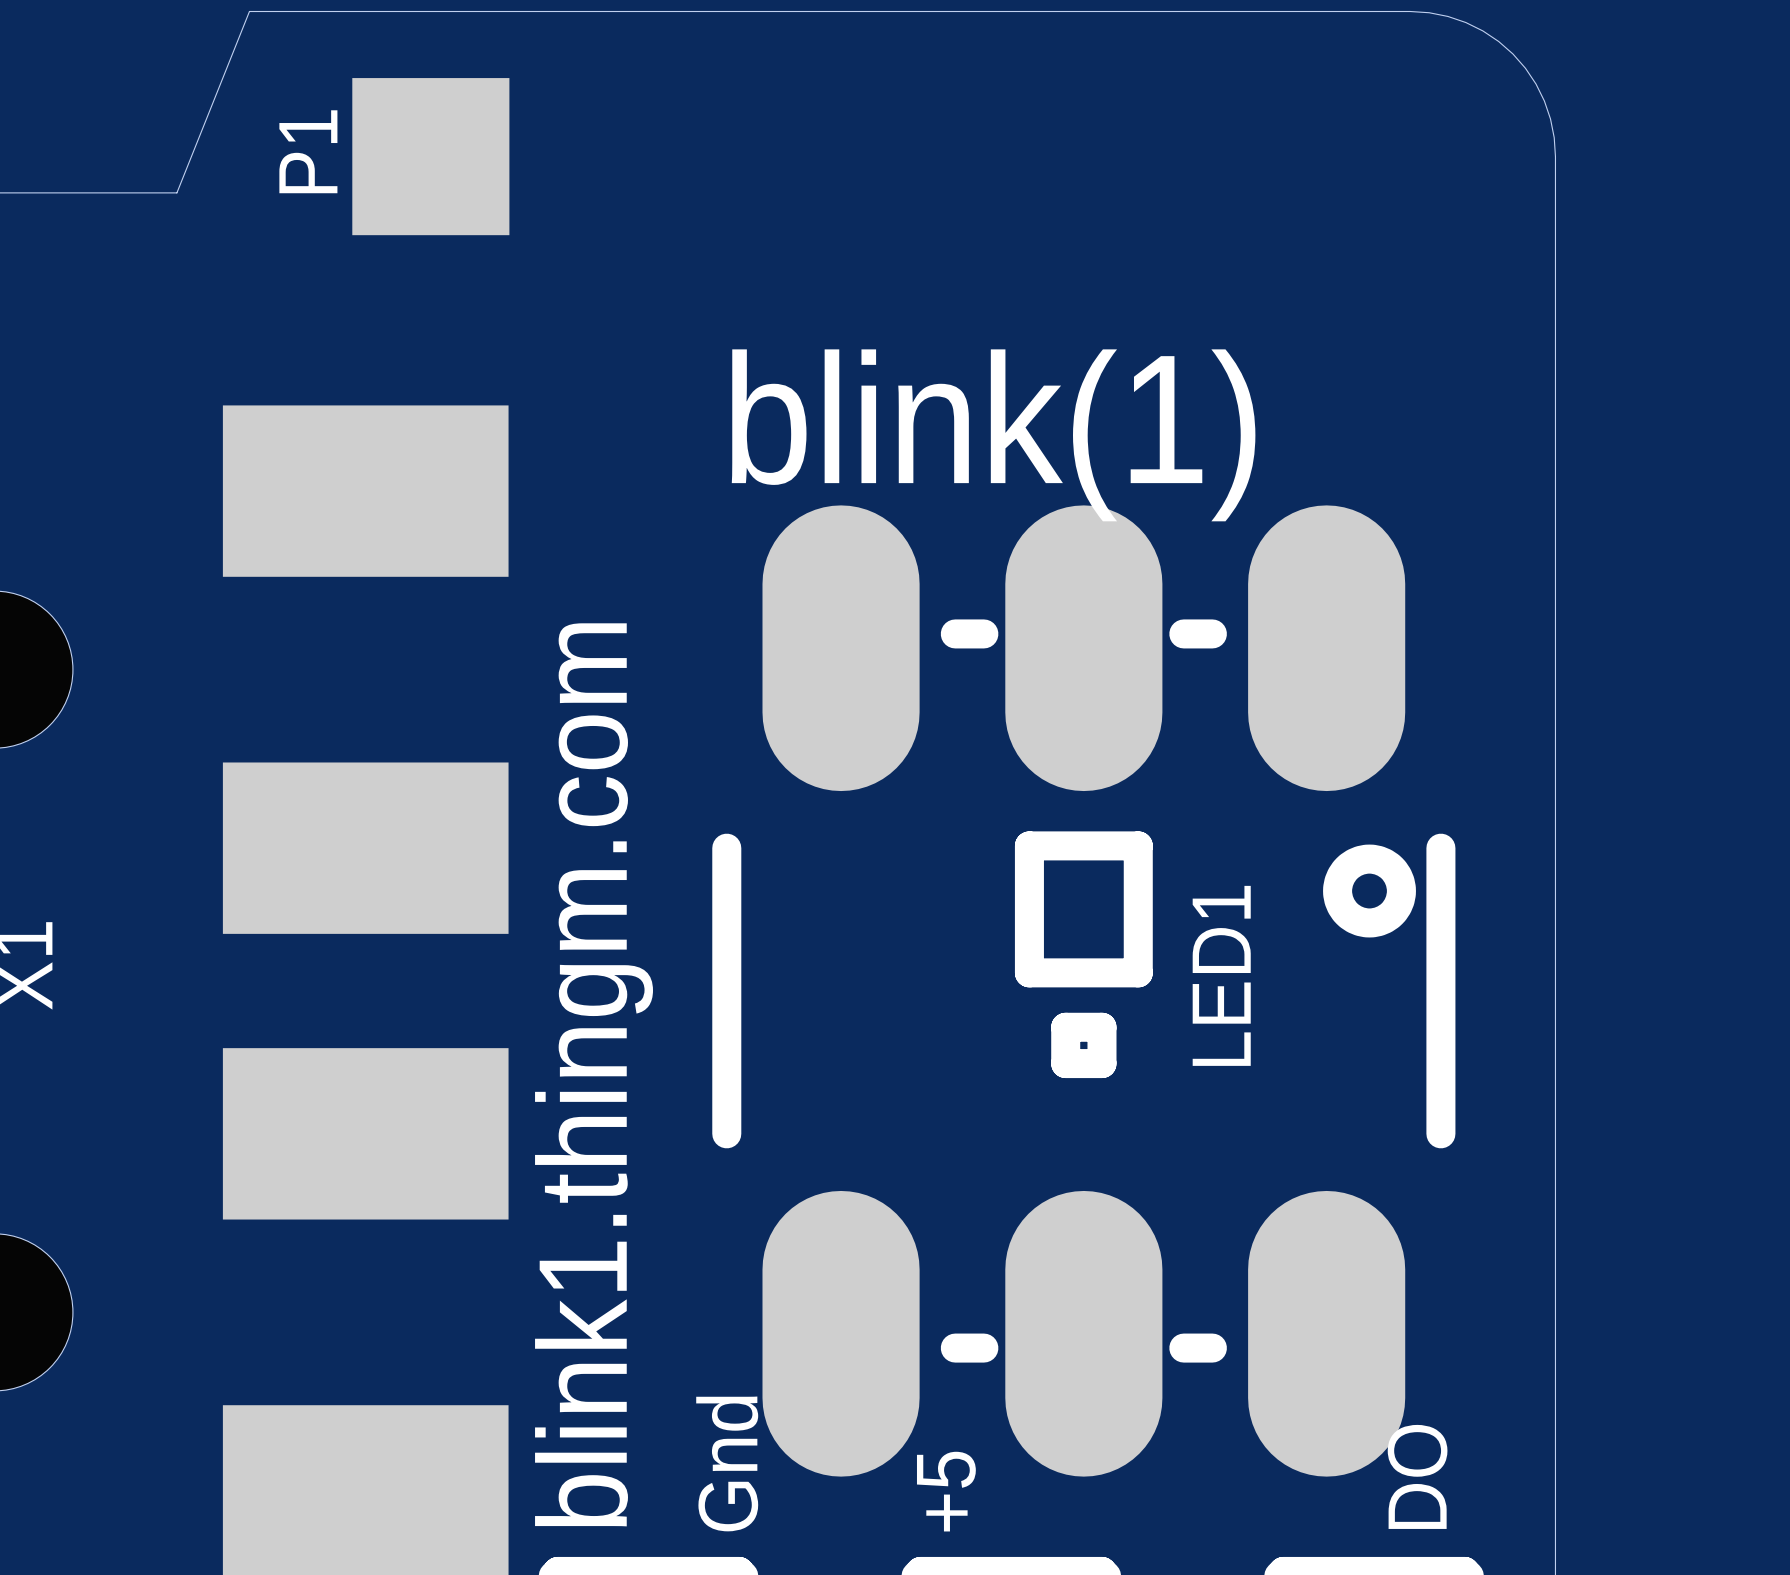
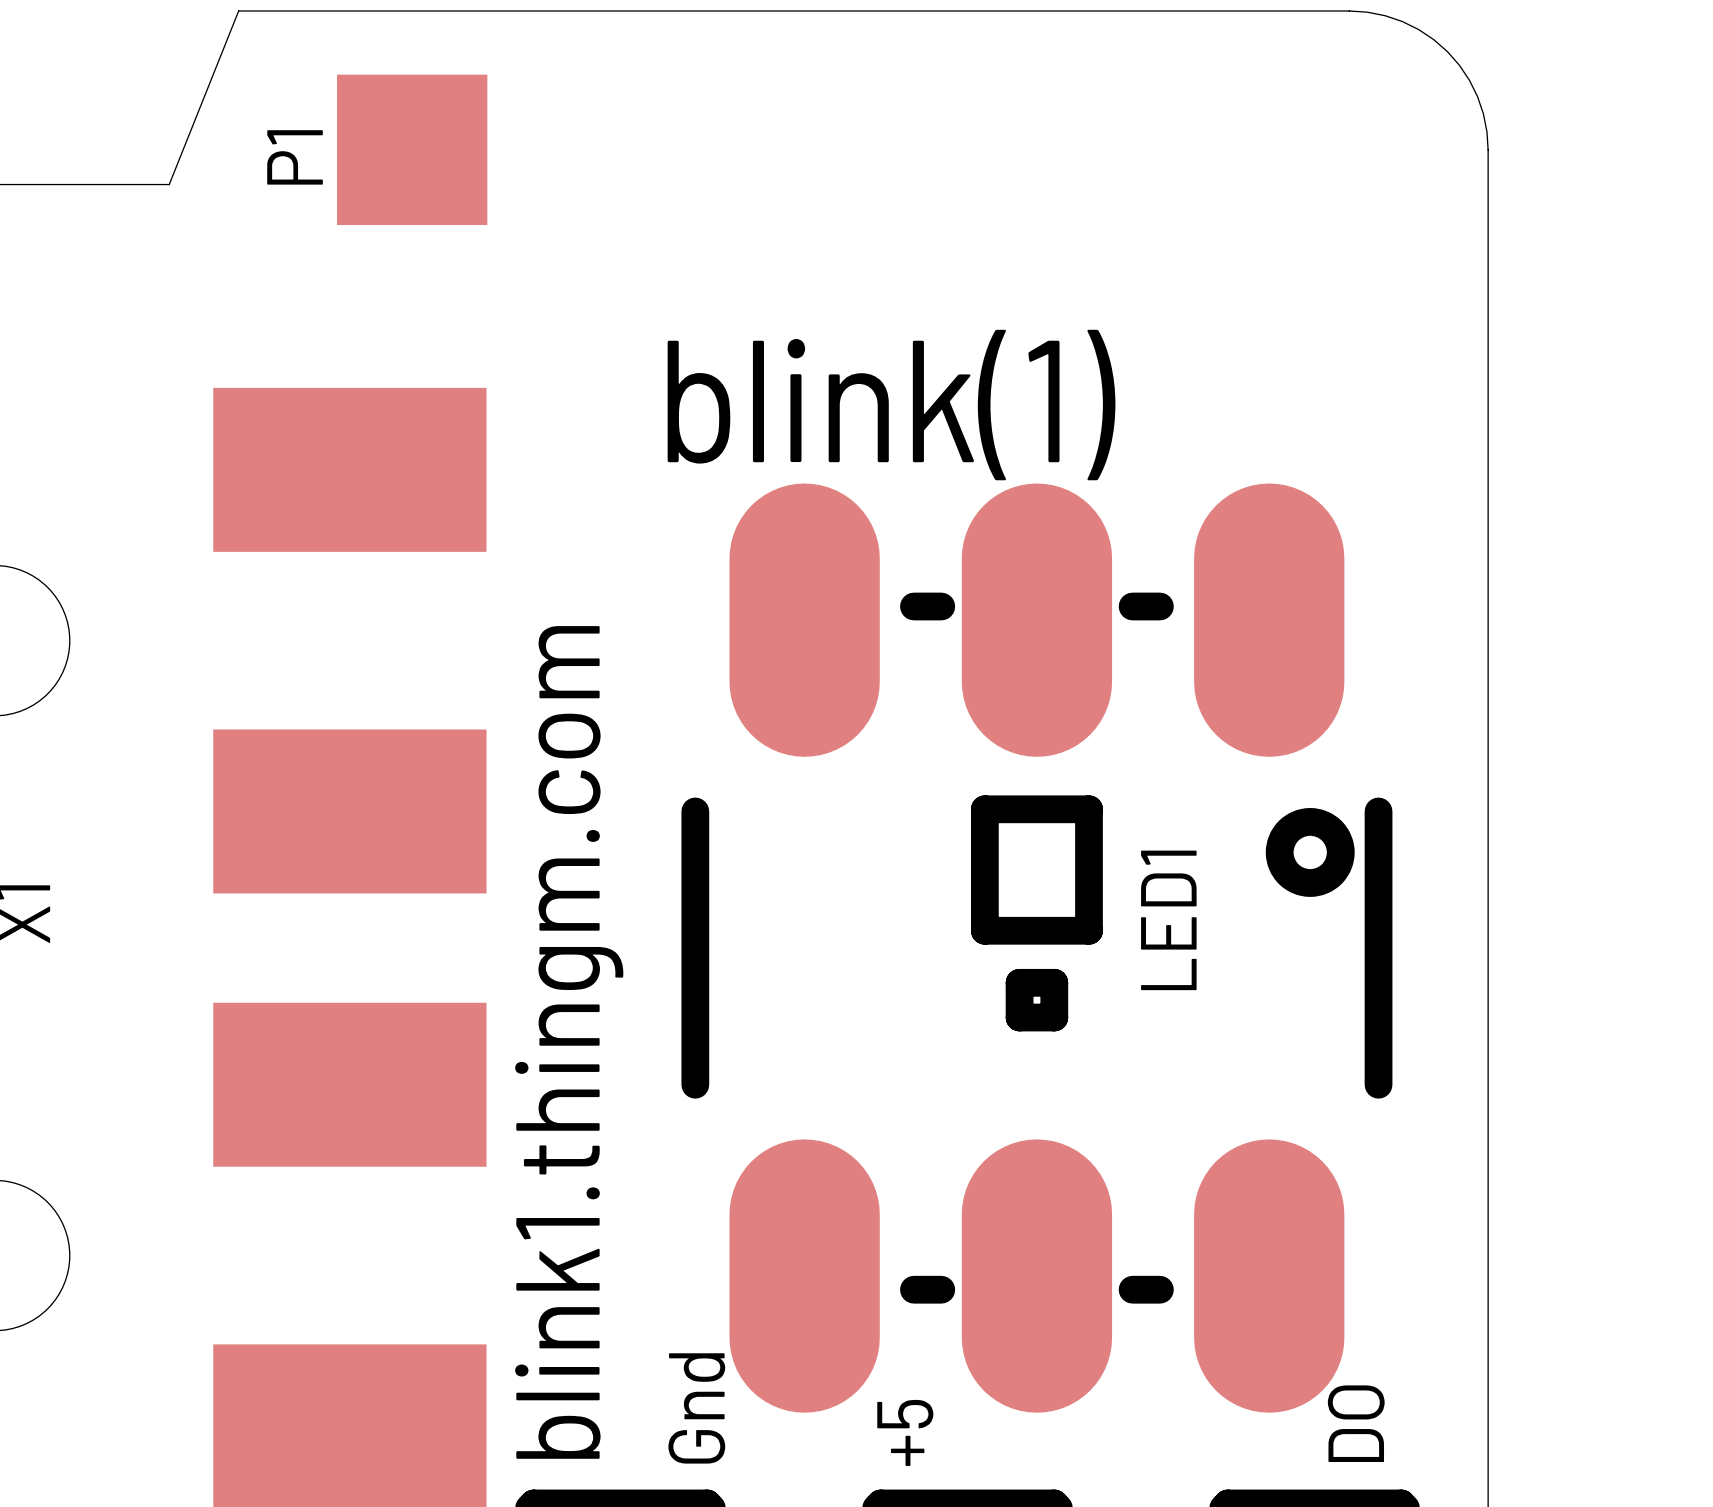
text position: blink(1) (993, 435) -> blink(1) (891, 405)

